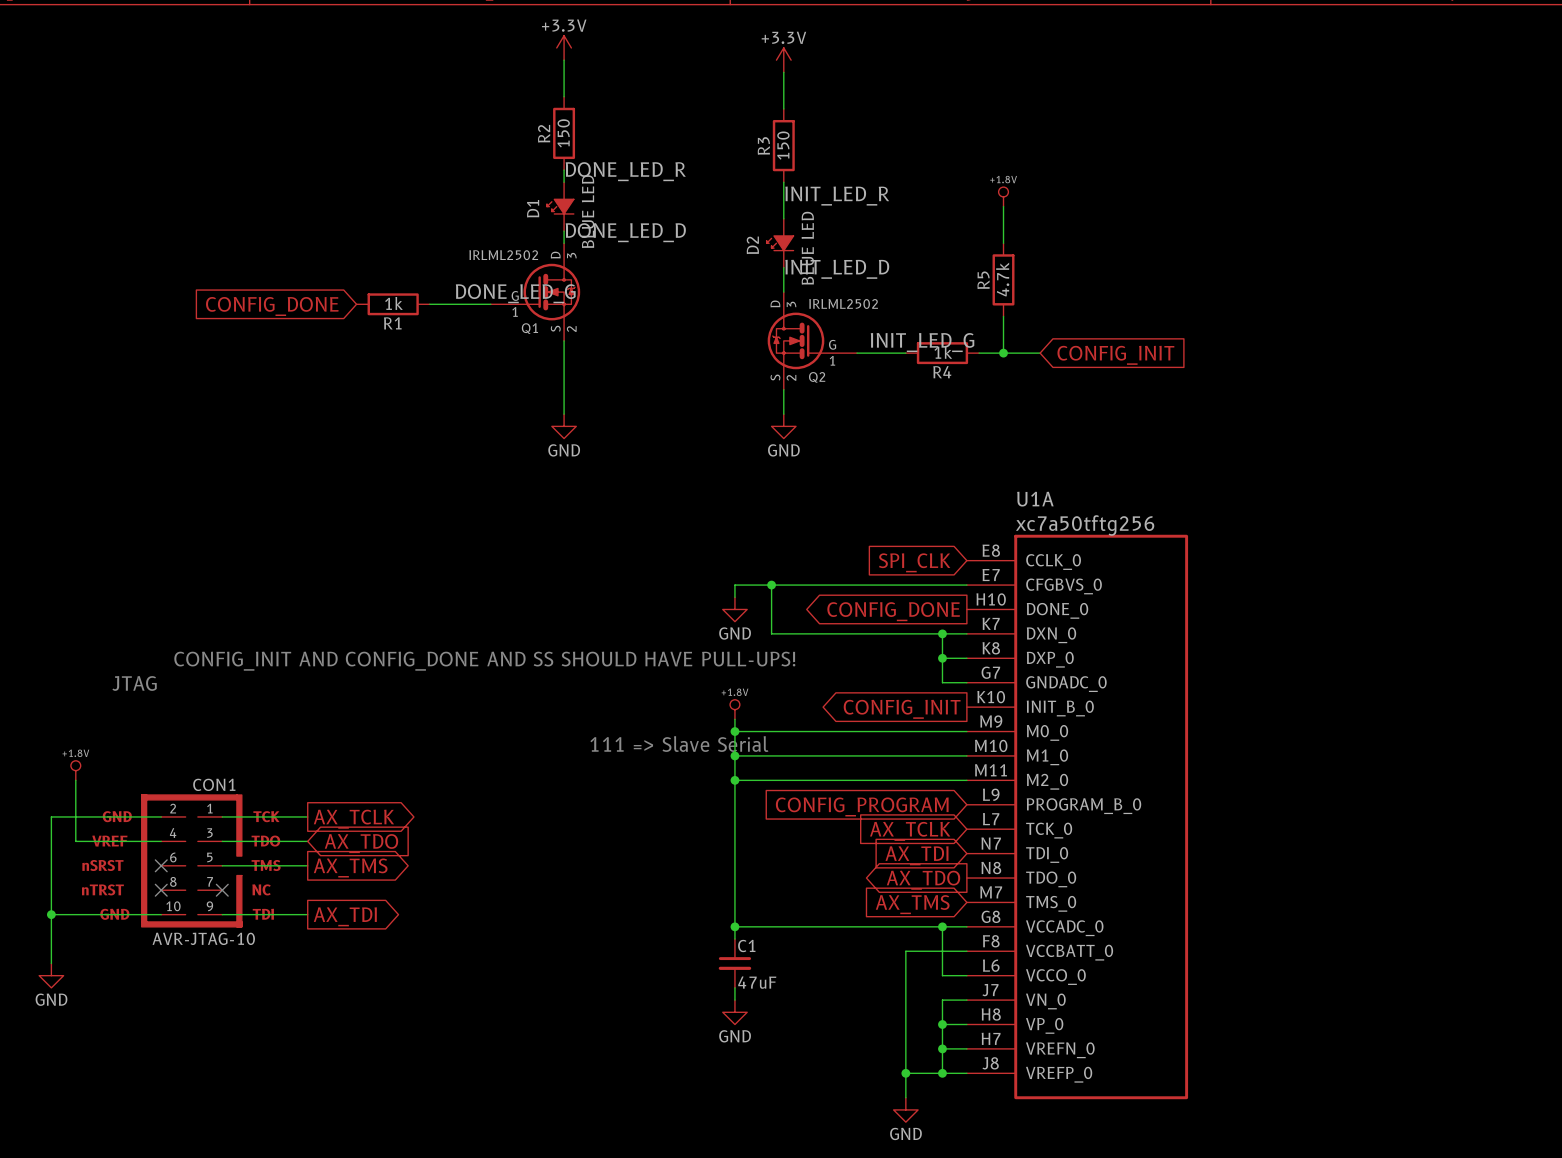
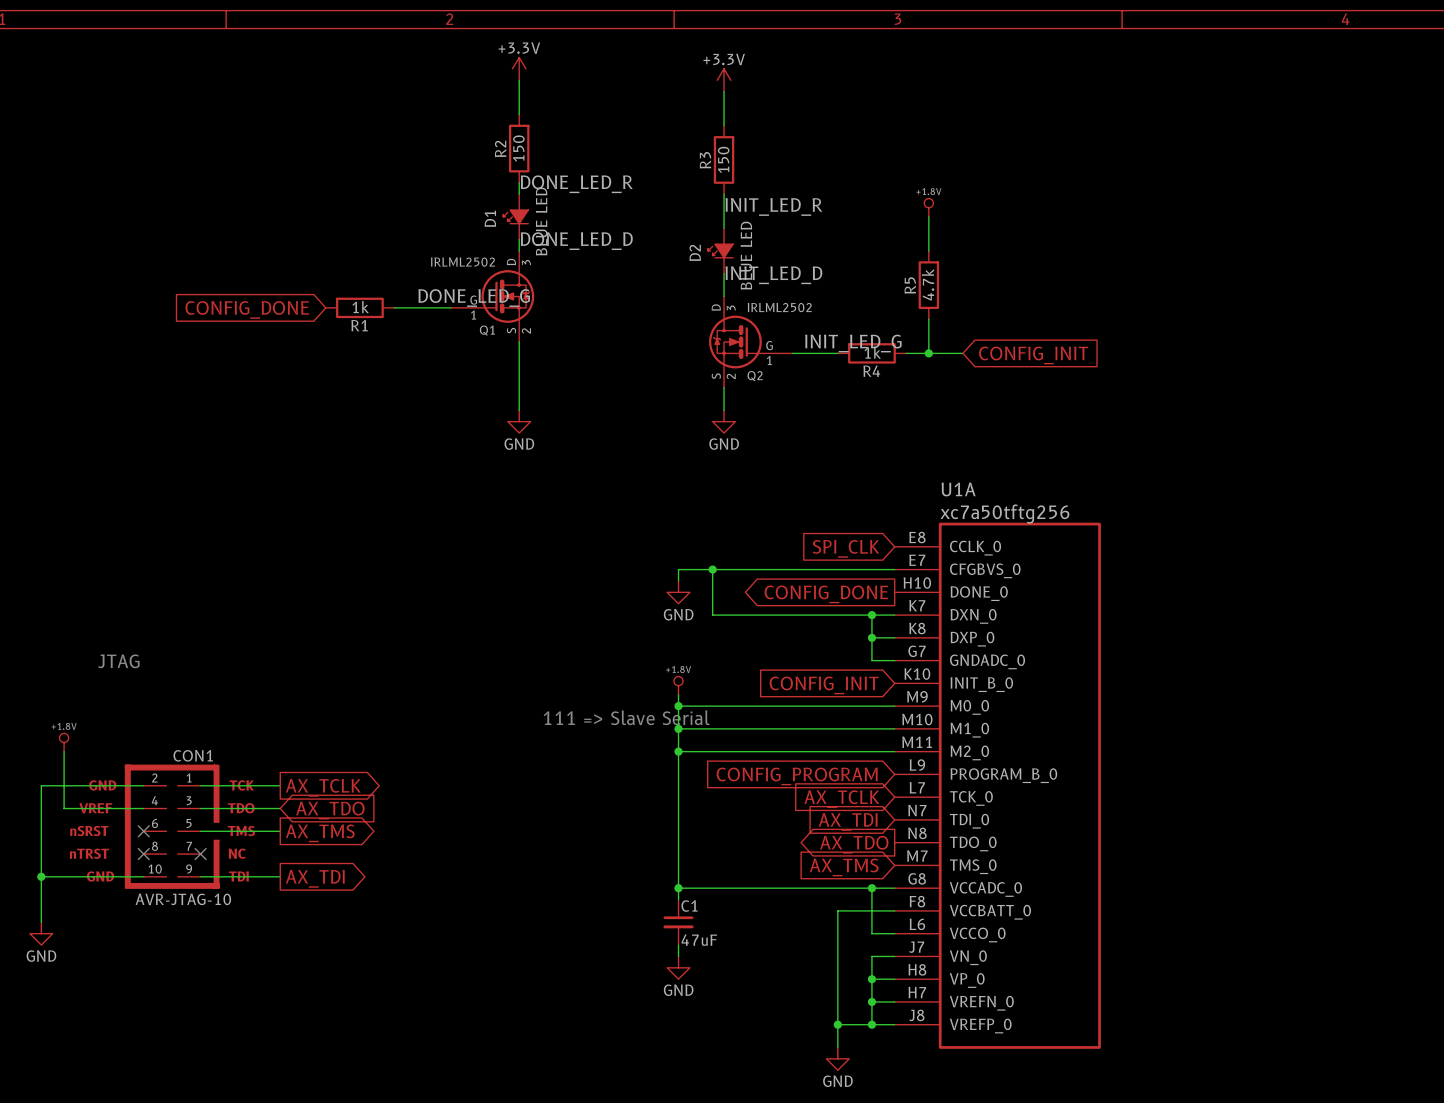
text: CONFIG_INIT AND CONFIG_DONE AND SS SHOULD HAVE PULL-UPS! (484, 661) -> none
global label shape: output (902, 709) -> input (824, 685)

